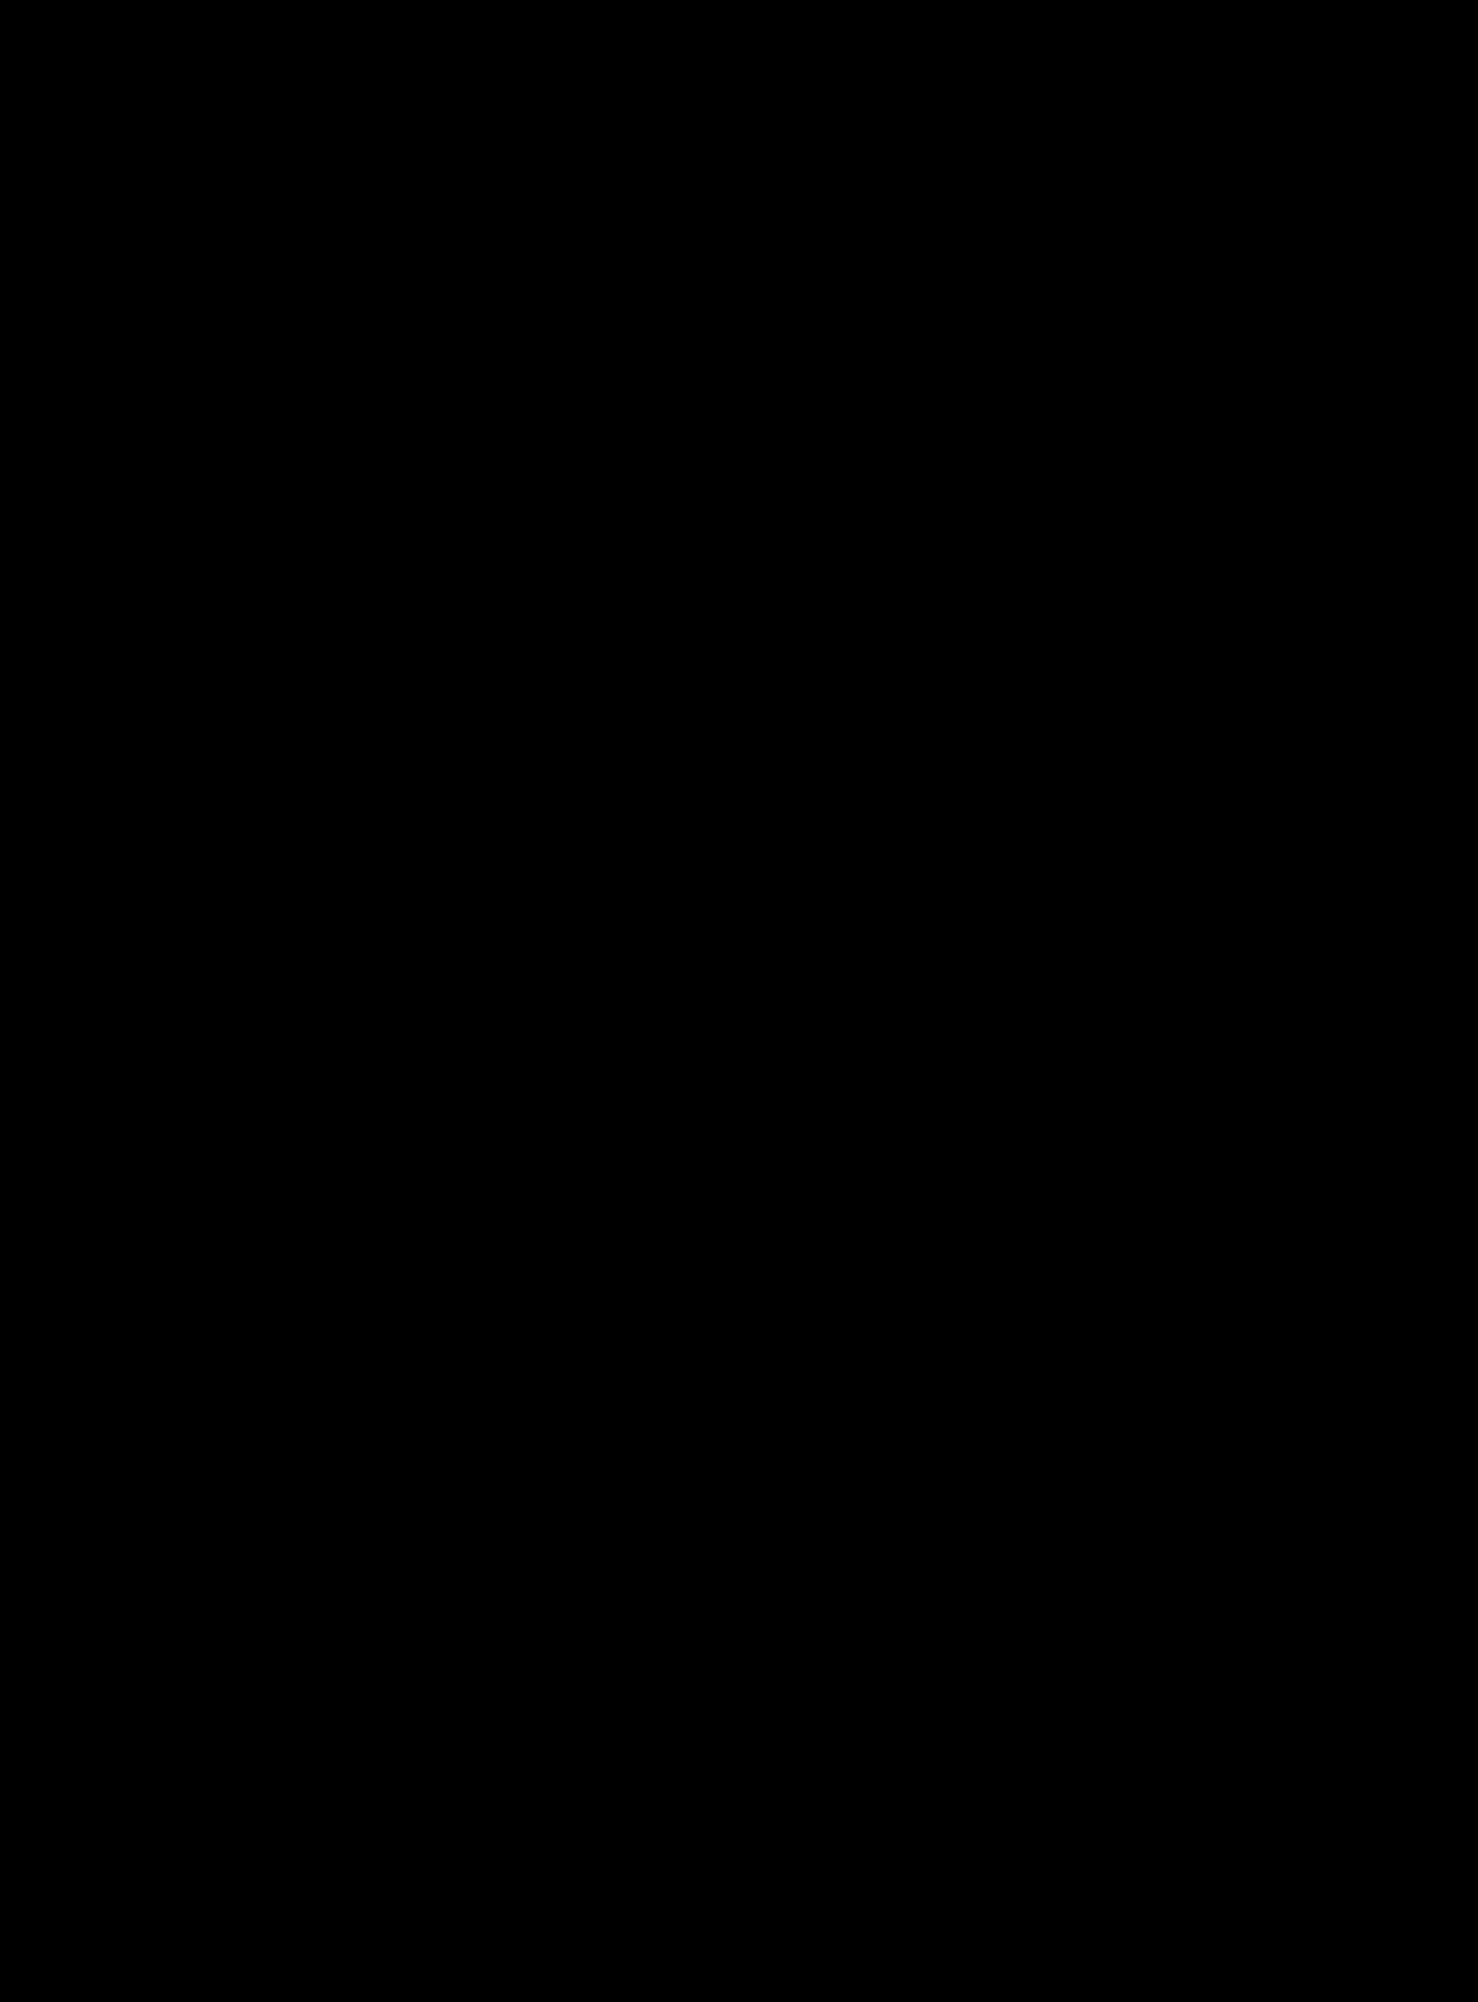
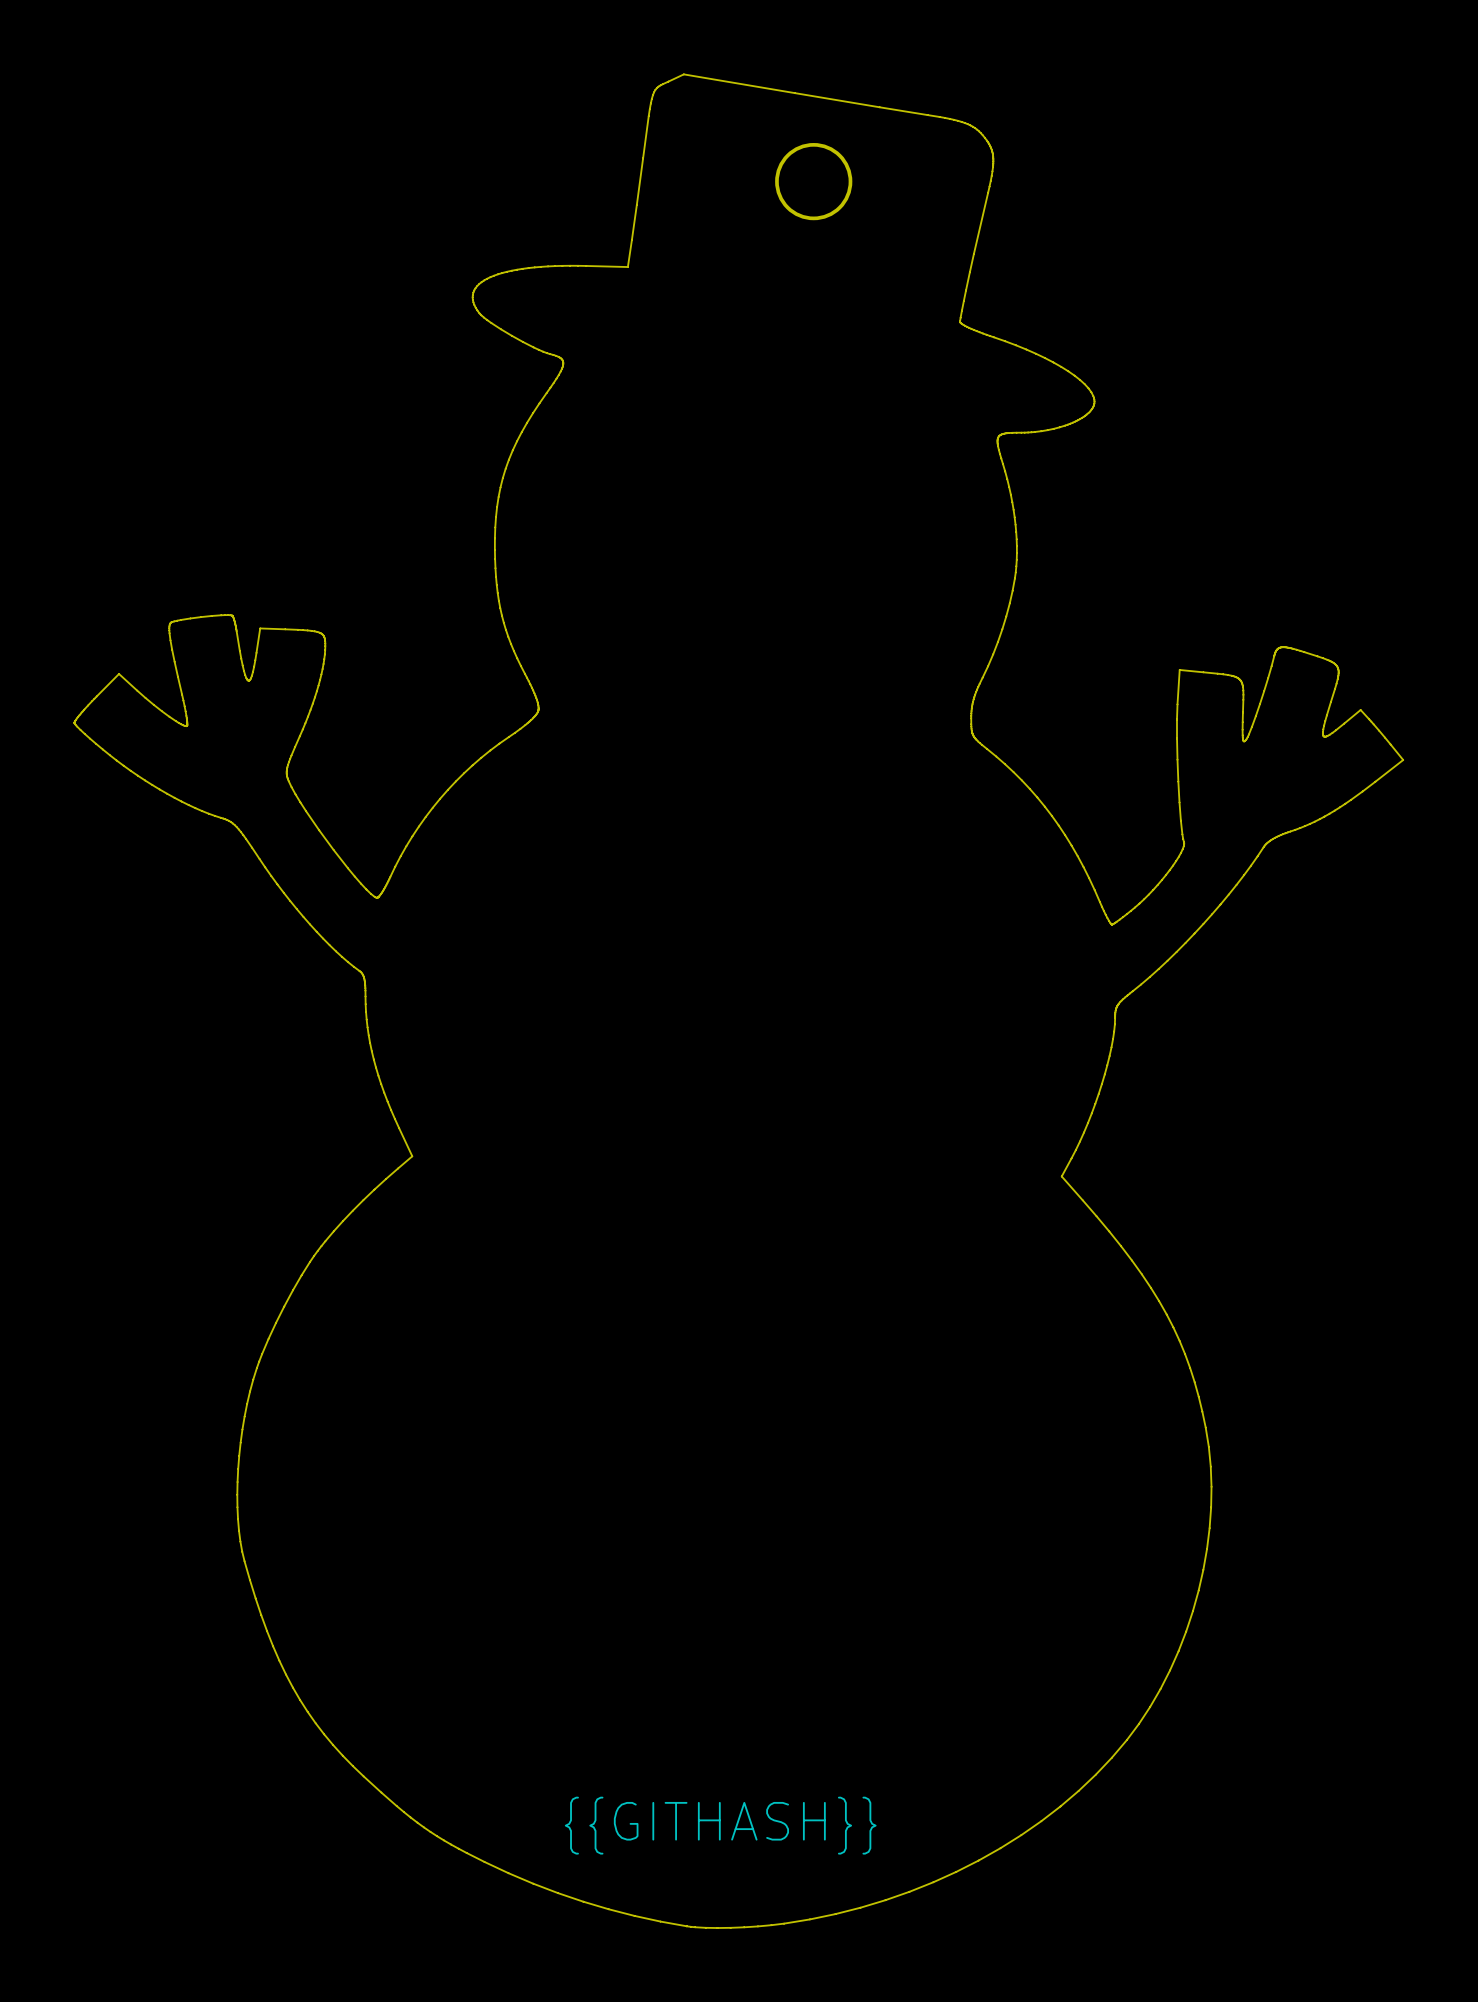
round board edge: none -> [775, 143, 853, 221]
board edge: none -> (959, 321) (993, 165) (990, 147) (977, 129) (964, 122) (944, 117) (683, 74) (656, 88) (649, 109) (627, 267) (562, 265) (517, 269) (487, 278) (477, 286) (473, 292) (474, 304) (483, 317) (523, 342) (559, 357) (563, 362) (558, 375) (527, 422) (512, 450) (502, 478) (496, 516) (495, 568) (500, 608) (508, 636) (534, 693) (538, 709) (527, 723) (472, 765) (440, 798) (412, 836) (378, 897)
board edge: none -> (960, 322) (971, 328) (1026, 349) (1053, 362) (1080, 379) (1088, 388) (1094, 398) (1094, 404) (1089, 411) (1070, 423) (1041, 431) (1004, 433) (998, 437) (998, 446) (1009, 486) (1014, 517) (1016, 566) (1012, 590) (1002, 629) (973, 699) (971, 724) (972, 733) (975, 739) (1021, 780) (1058, 825) (1083, 866) (1111, 924)
board edge: none -> (232, 615) (201, 617) (170, 623) (170, 640) (187, 725)
board edge: none -> (232, 616) (243, 670) (248, 680) (253, 671) (260, 628) (311, 630) (319, 632) (324, 636) (324, 654) (320, 679) (310, 710) (288, 762) (287, 776) (300, 802) (333, 850) (360, 883) (377, 897)
board edge: none -> (74, 722) (119, 673) (161, 711) (186, 726)
board edge: none -> (74, 722) (102, 749) (145, 780) (188, 805) (232, 823) (303, 916) (336, 951) (361, 973) (365, 983) (368, 1035) (375, 1067) (391, 1110) (412, 1156) (352, 1210) (309, 1261) (292, 1290) (268, 1338) (256, 1368) (247, 1403) (240, 1442) (237, 1482) (240, 1541) (261, 1615) (279, 1660) (292, 1687) (315, 1723) (352, 1766) (410, 1817) (451, 1844) (508, 1873) (583, 1901) (660, 1921) (690, 1926) (717, 1928) (784, 1923) (860, 1907) (933, 1882) (1000, 1848) (1060, 1806) (1111, 1757) (1150, 1706) (1178, 1651) (1198, 1590) (1209, 1528) (1210, 1466) (1205, 1427) (1198, 1396) (1179, 1340) (1150, 1287) (1109, 1231) (1061, 1176) (1084, 1132) (1098, 1093) (1109, 1056) (1115, 1010) (1118, 1003) (1167, 960) (1203, 923) (1236, 884) (1267, 842) (1334, 810) (1403, 760) (1360, 710) (1332, 732) (1323, 736) (1324, 725) (1338, 677) (1338, 668) (1327, 659) (1286, 647) (1279, 647) (1275, 651) (1255, 716) (1244, 741)
board edge: none -> (1243, 740) (1243, 690) (1239, 679) (1227, 674) (1179, 669) (1177, 759) (1183, 846) (1173, 865) (1153, 889) (1135, 907) (1112, 924)
text: none -> {{GITHASH}} (720, 1825)

